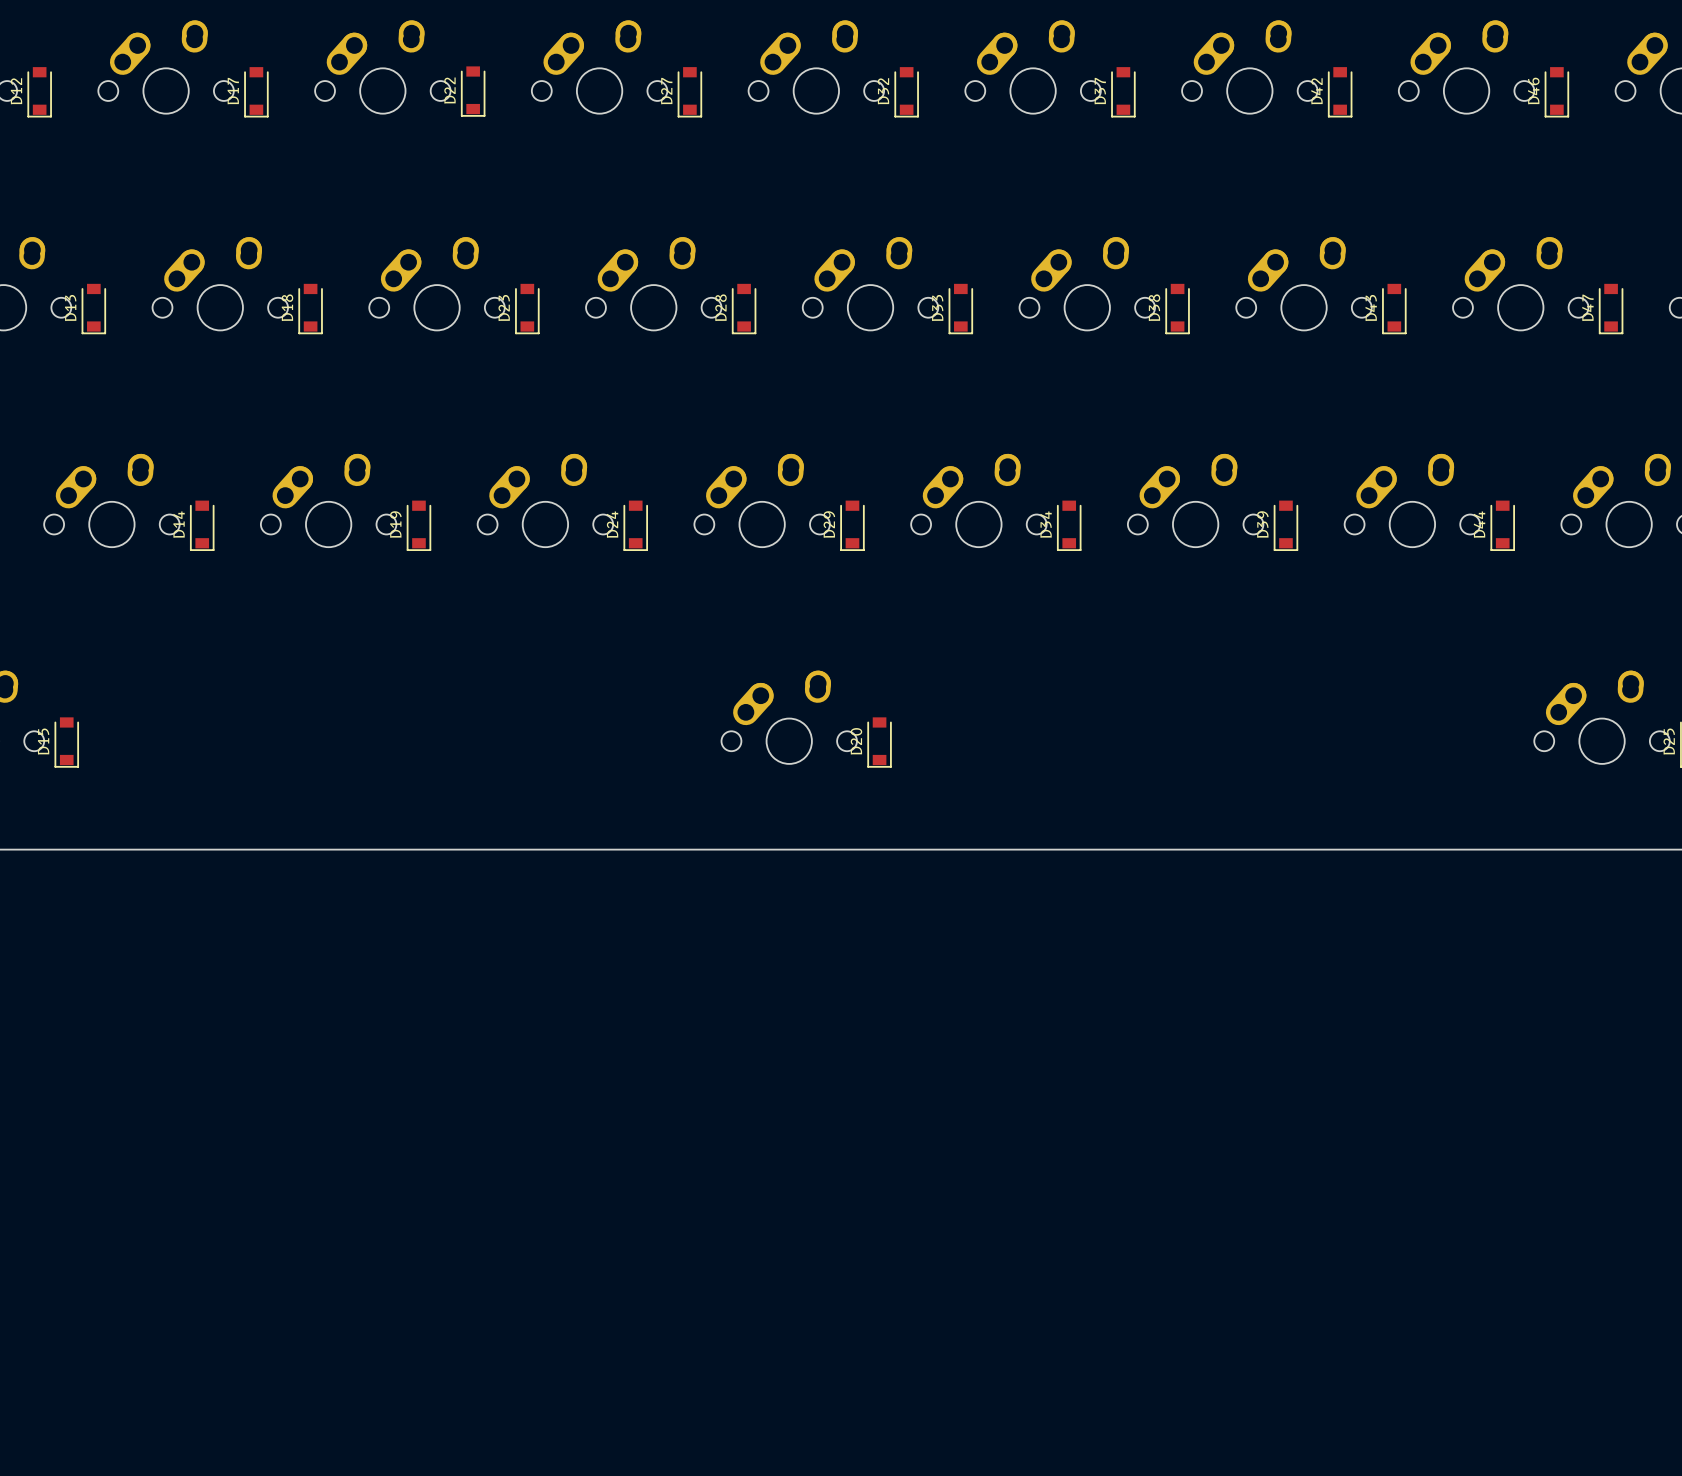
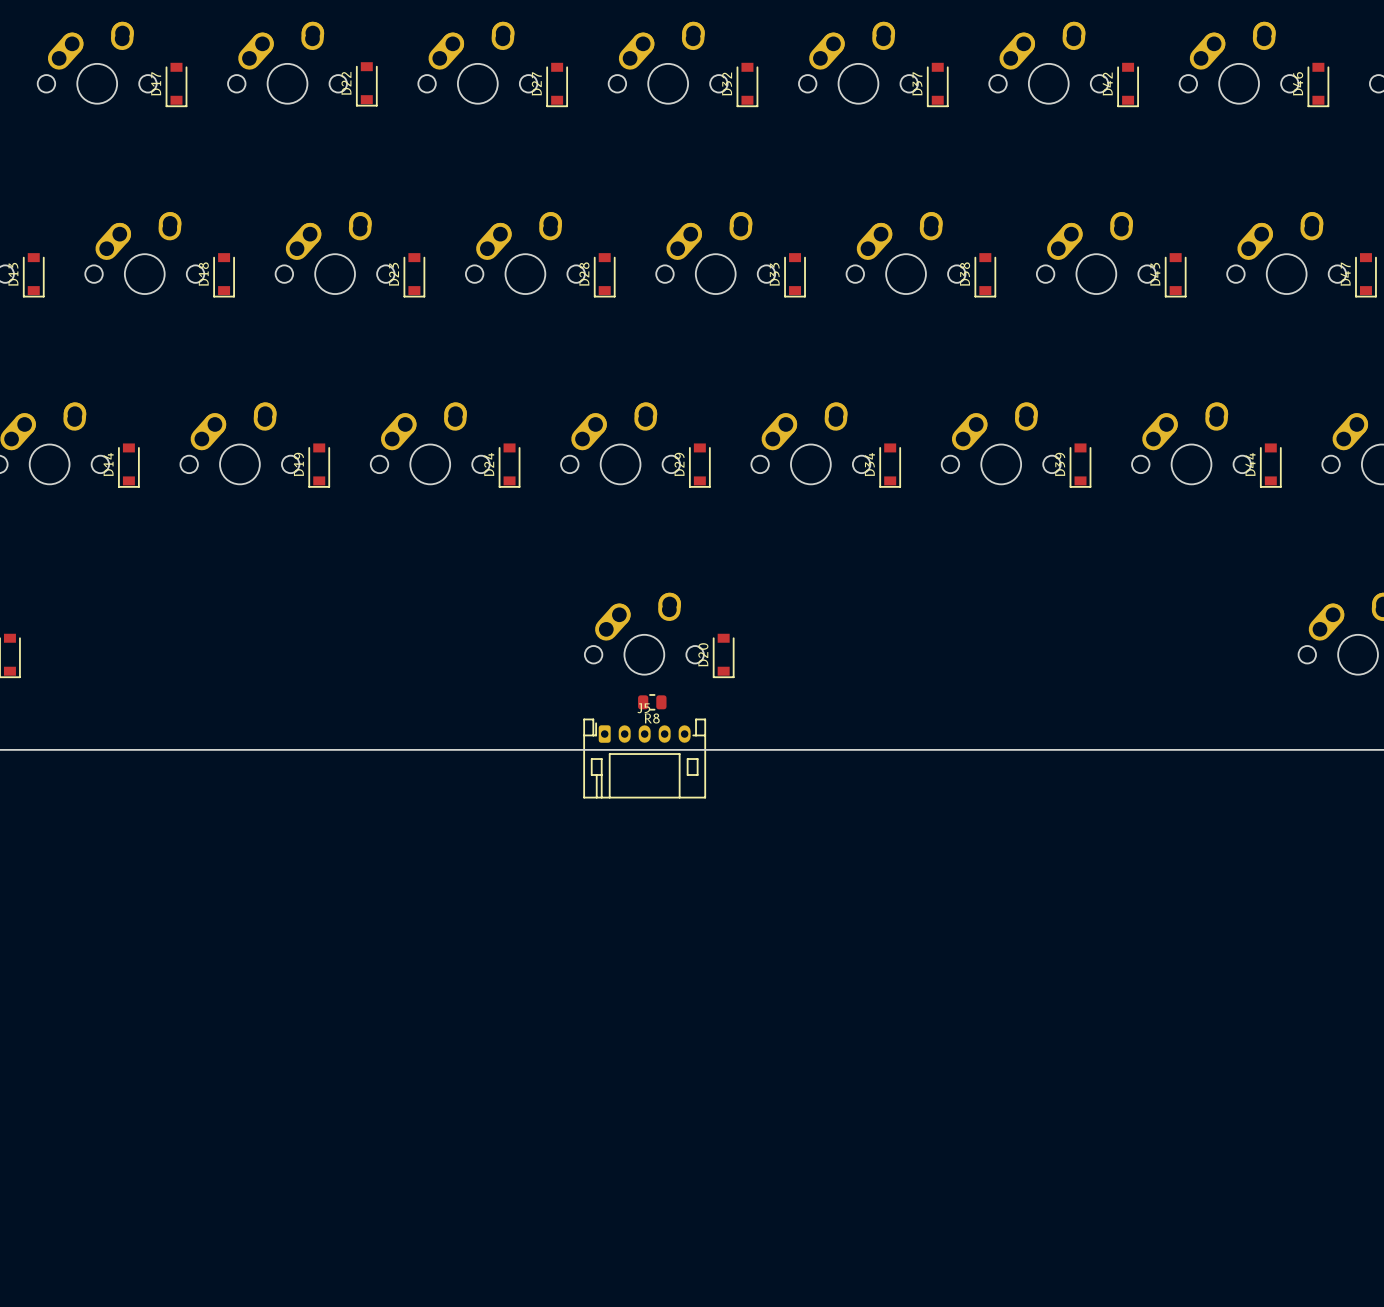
R8: none -> (652, 702)
J5: none -> (644, 758)

